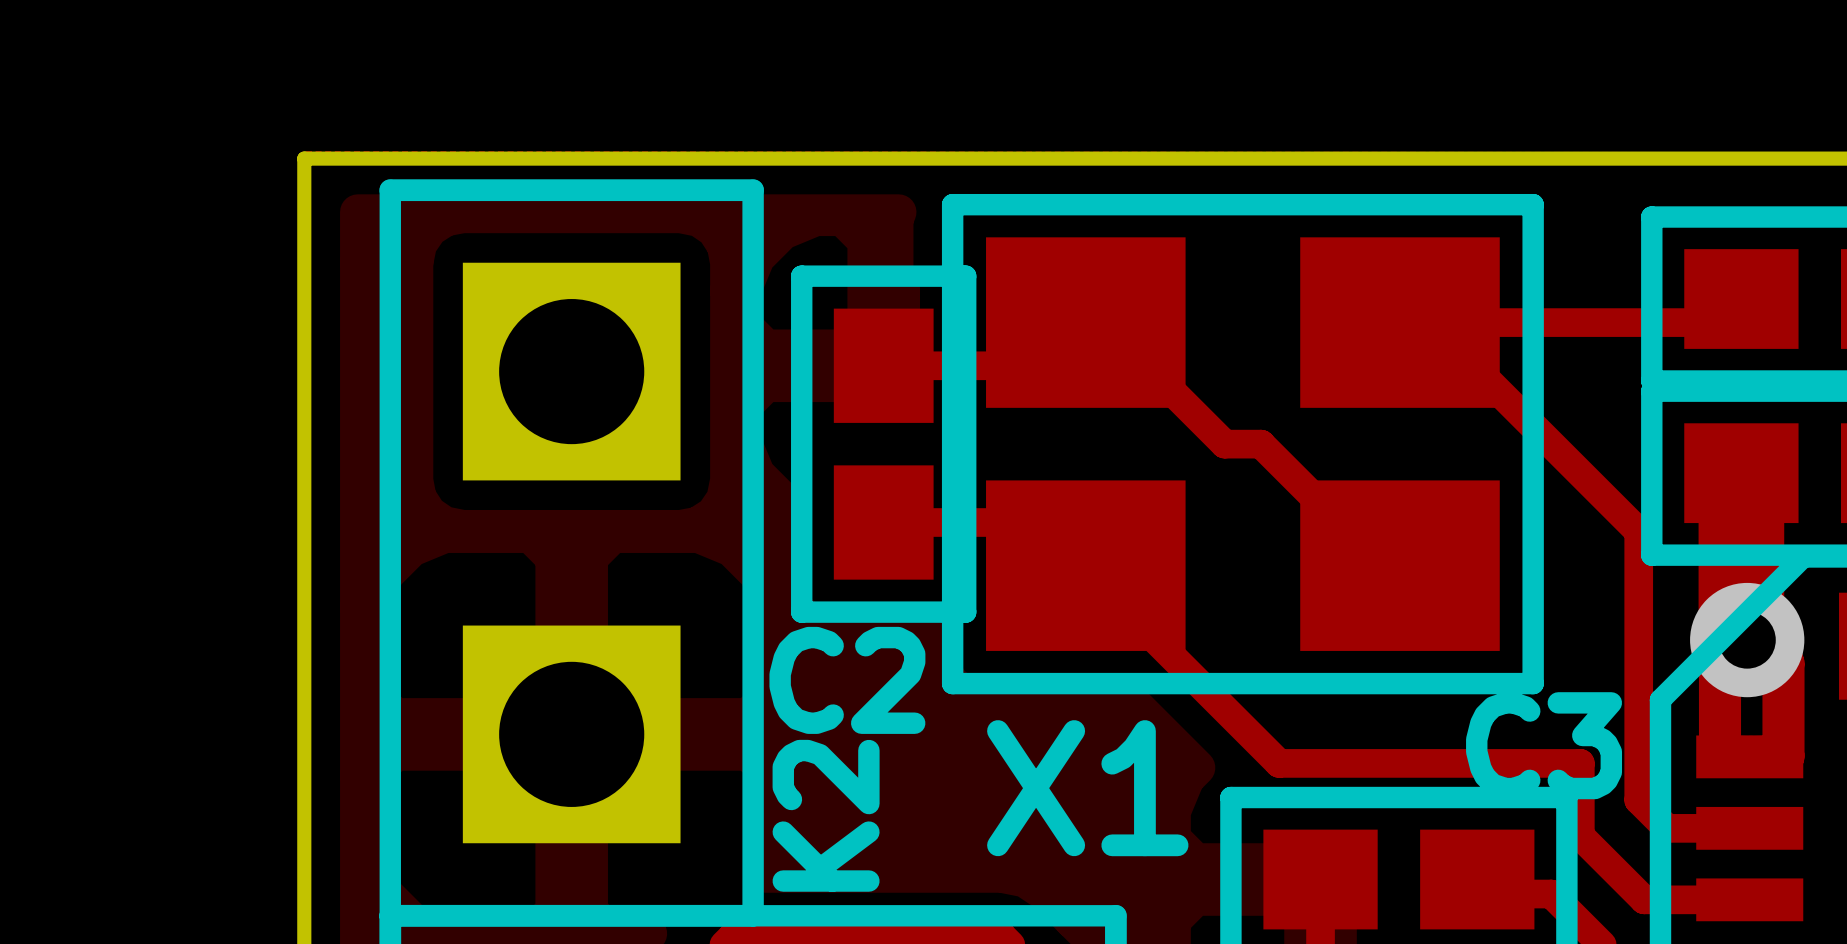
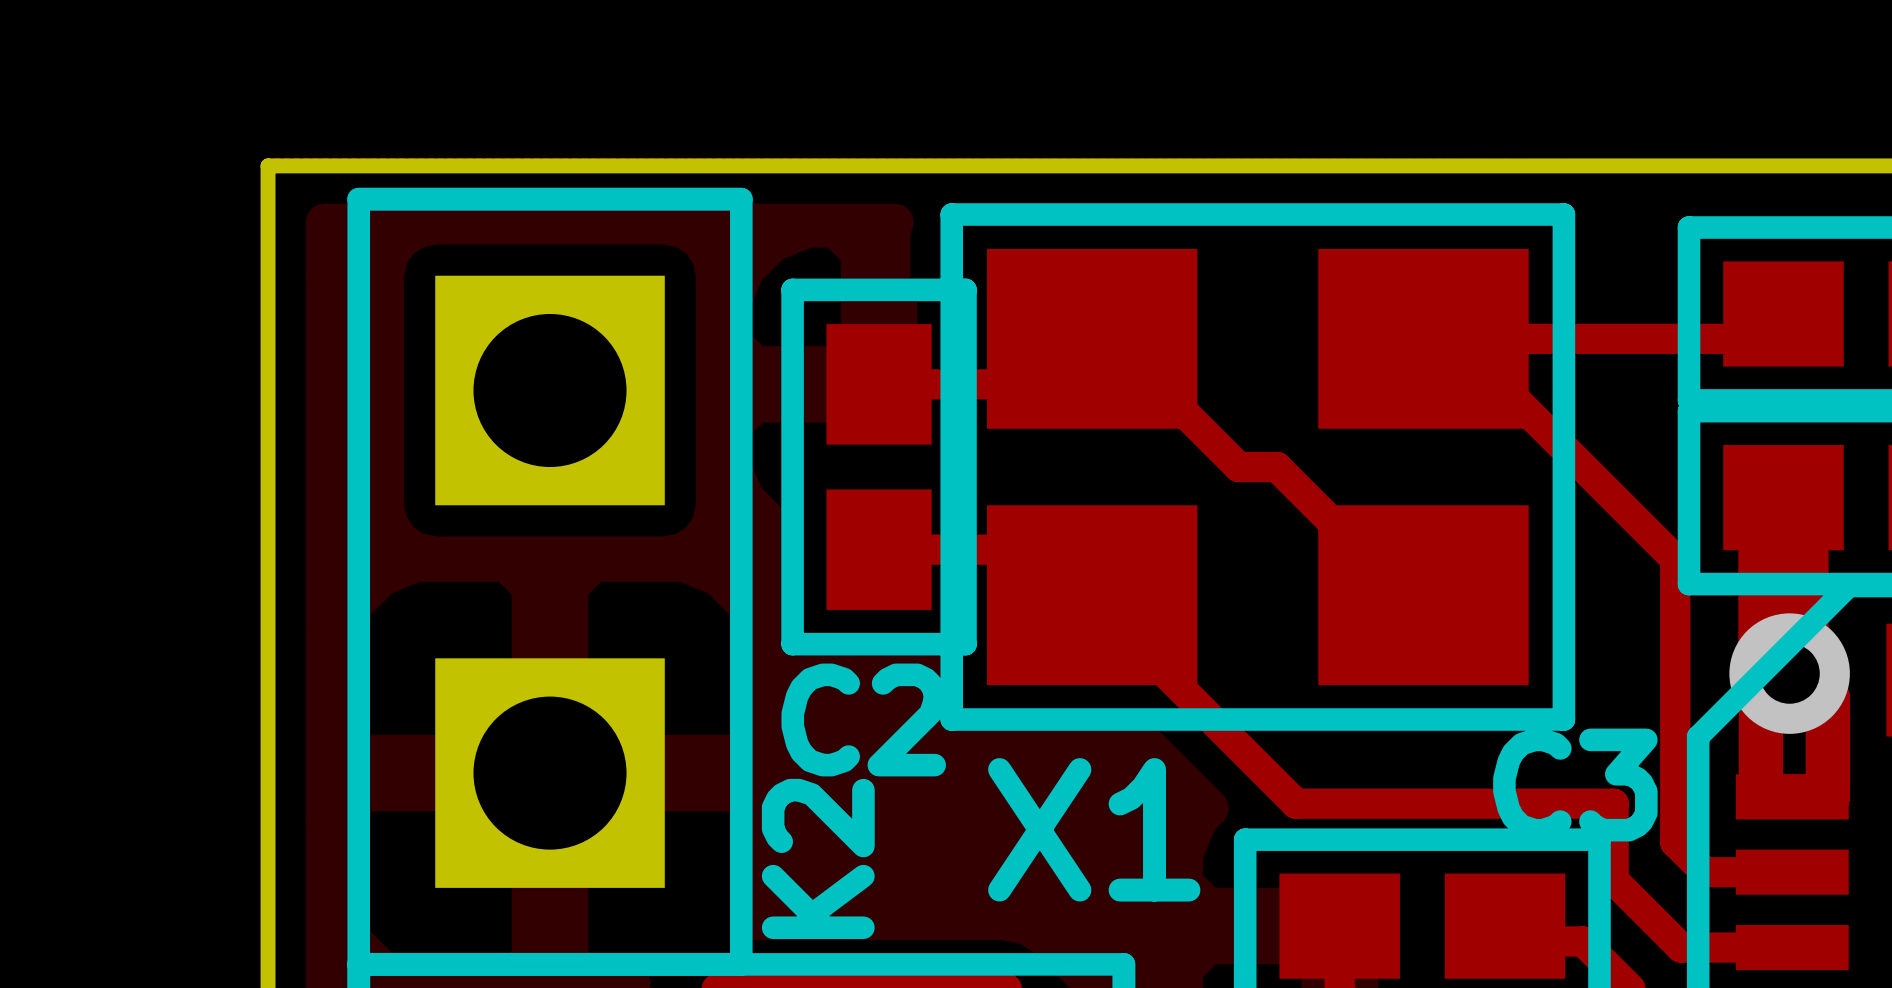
C2 name position: C2 (847, 680) -> C2 (863, 719)

